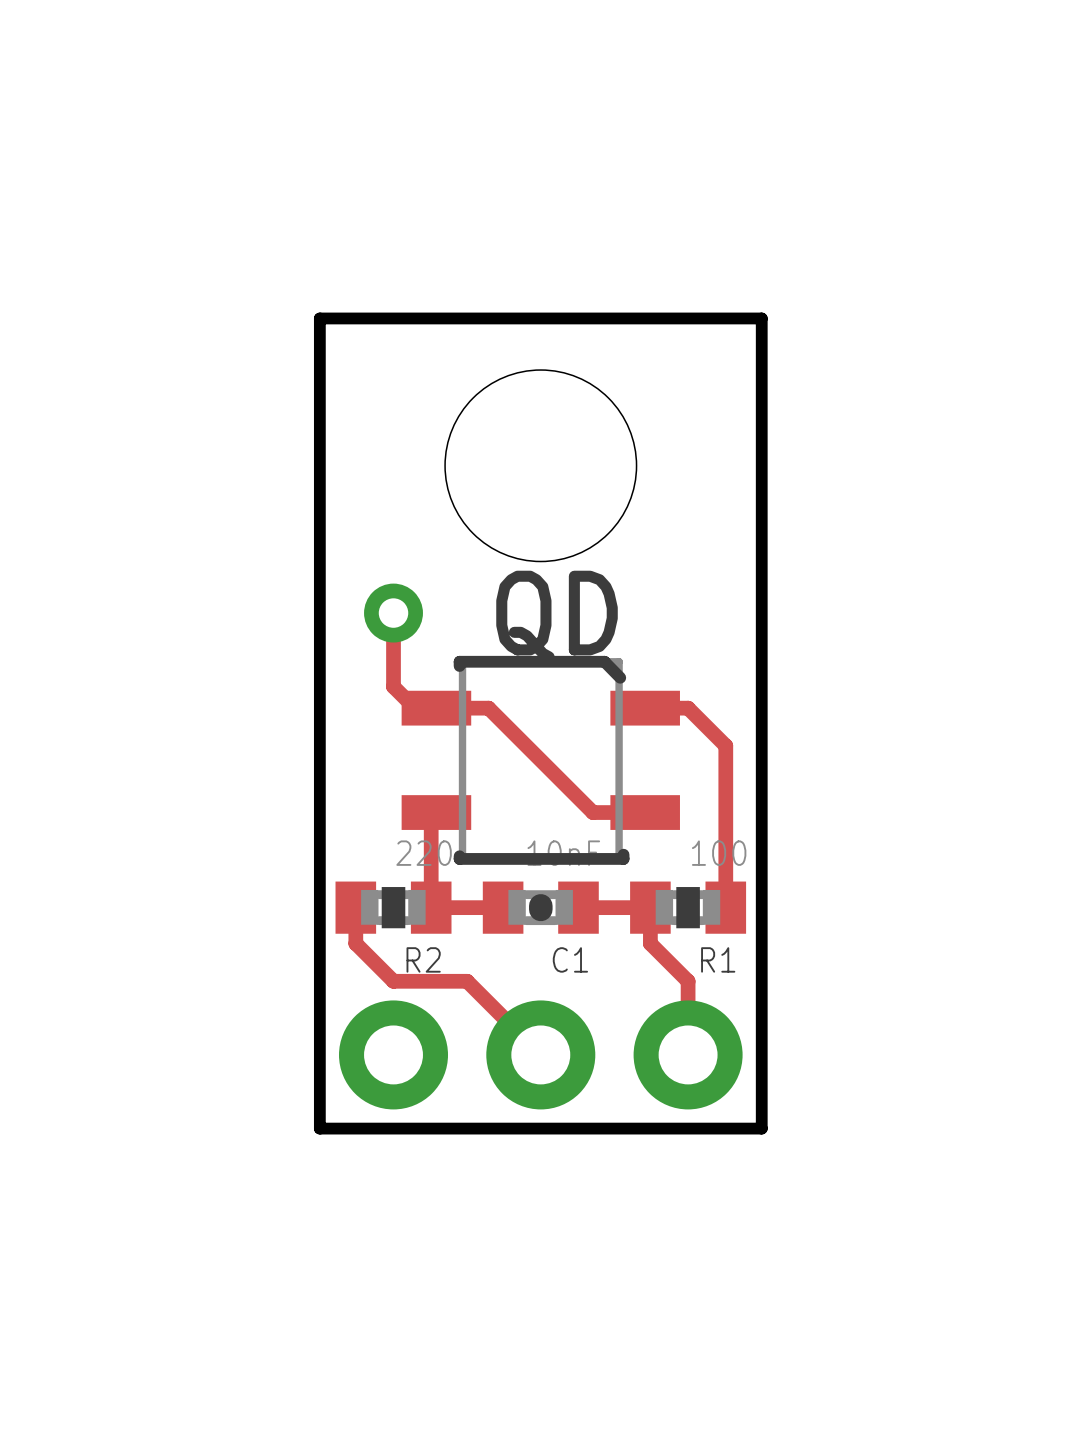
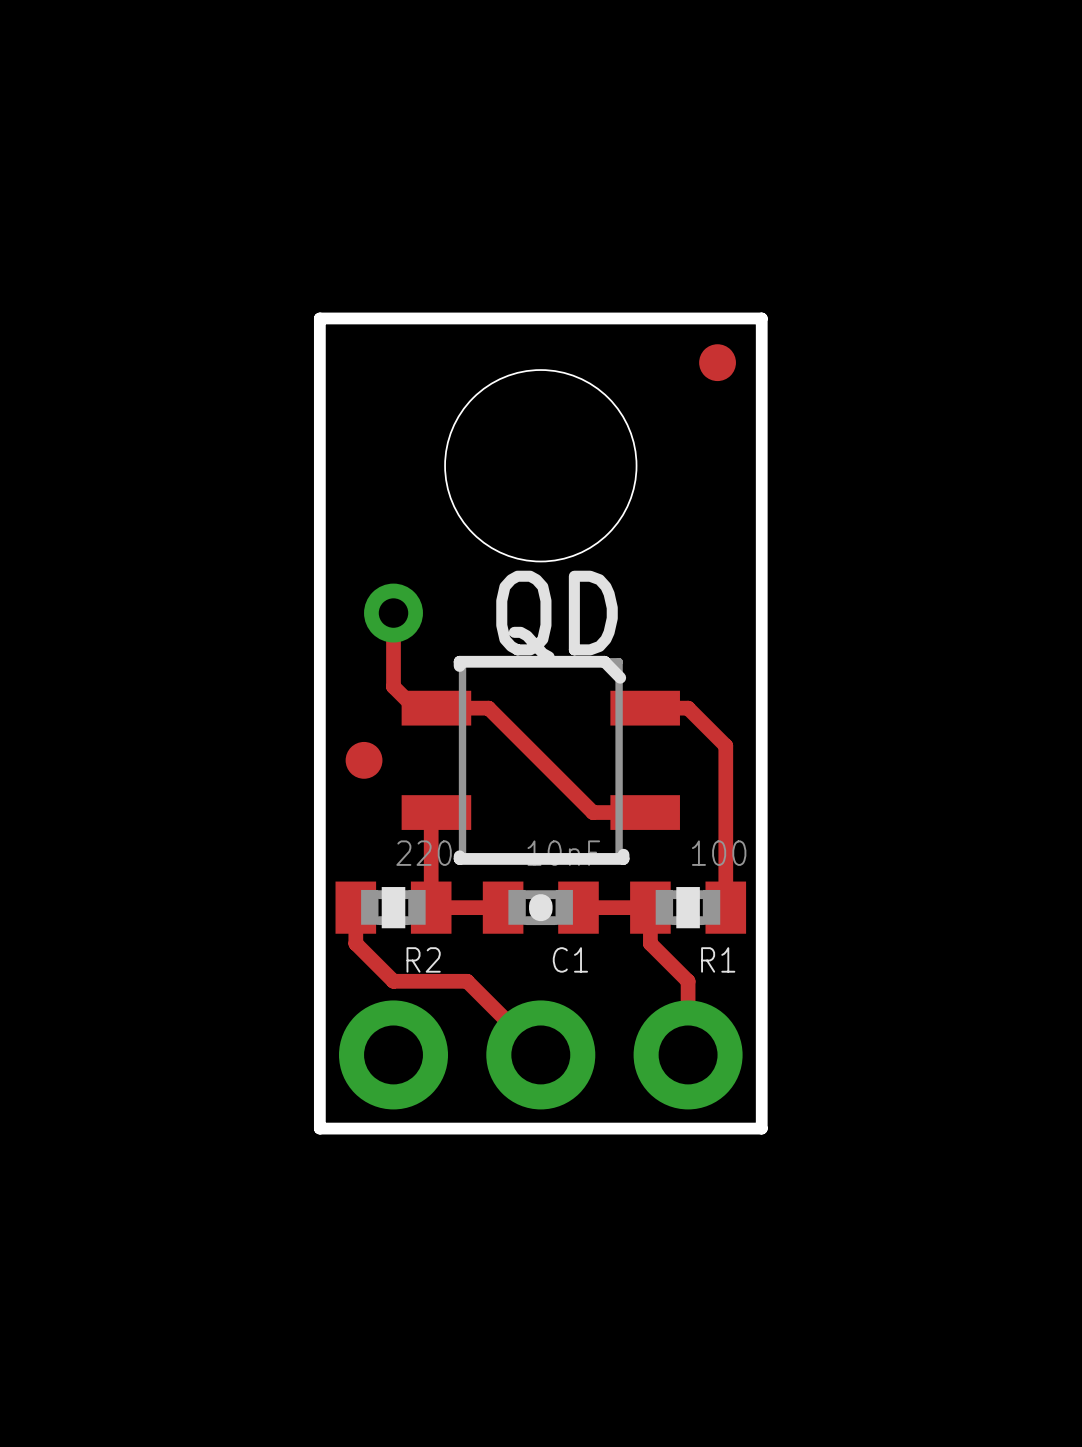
part: none -> (717, 362)
part: none -> (364, 760)

